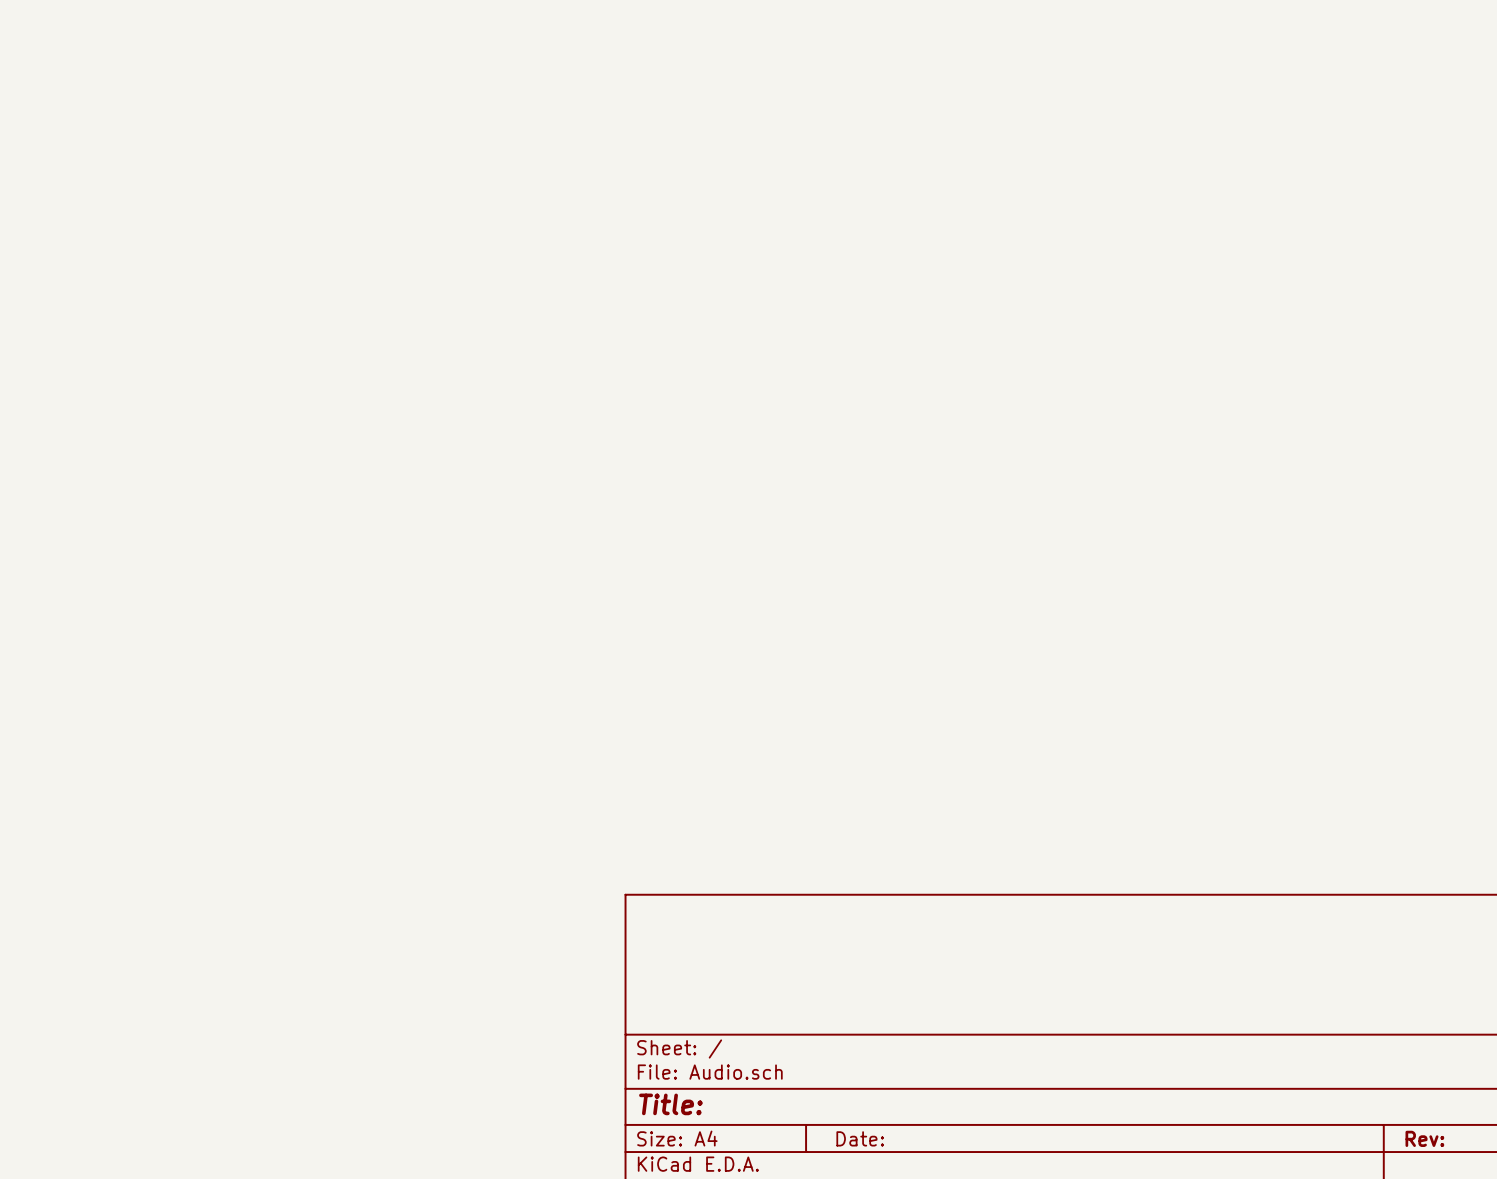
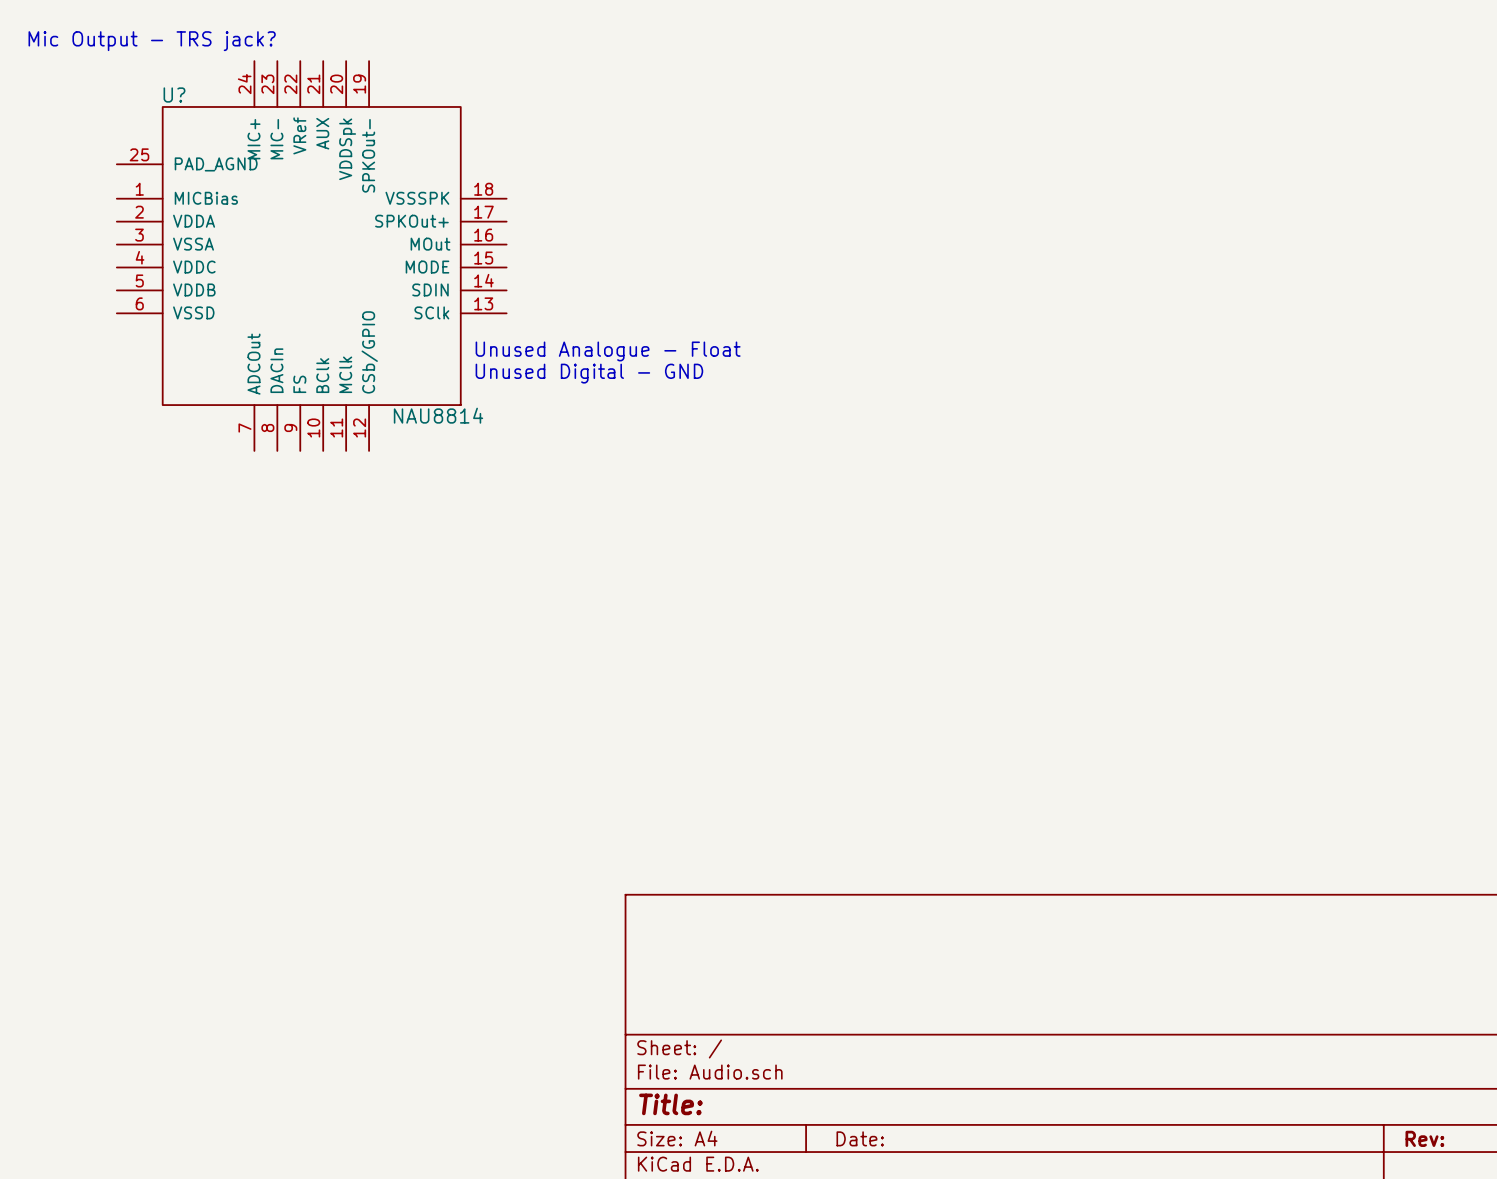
text: none -> Mic Output - TRS jack? (152, 41)
U?: none -> NAU8814 (311, 256)
text: none -> Unused Analogue - Float (608, 351)
text: none -> Unused Digital - GND (589, 373)

